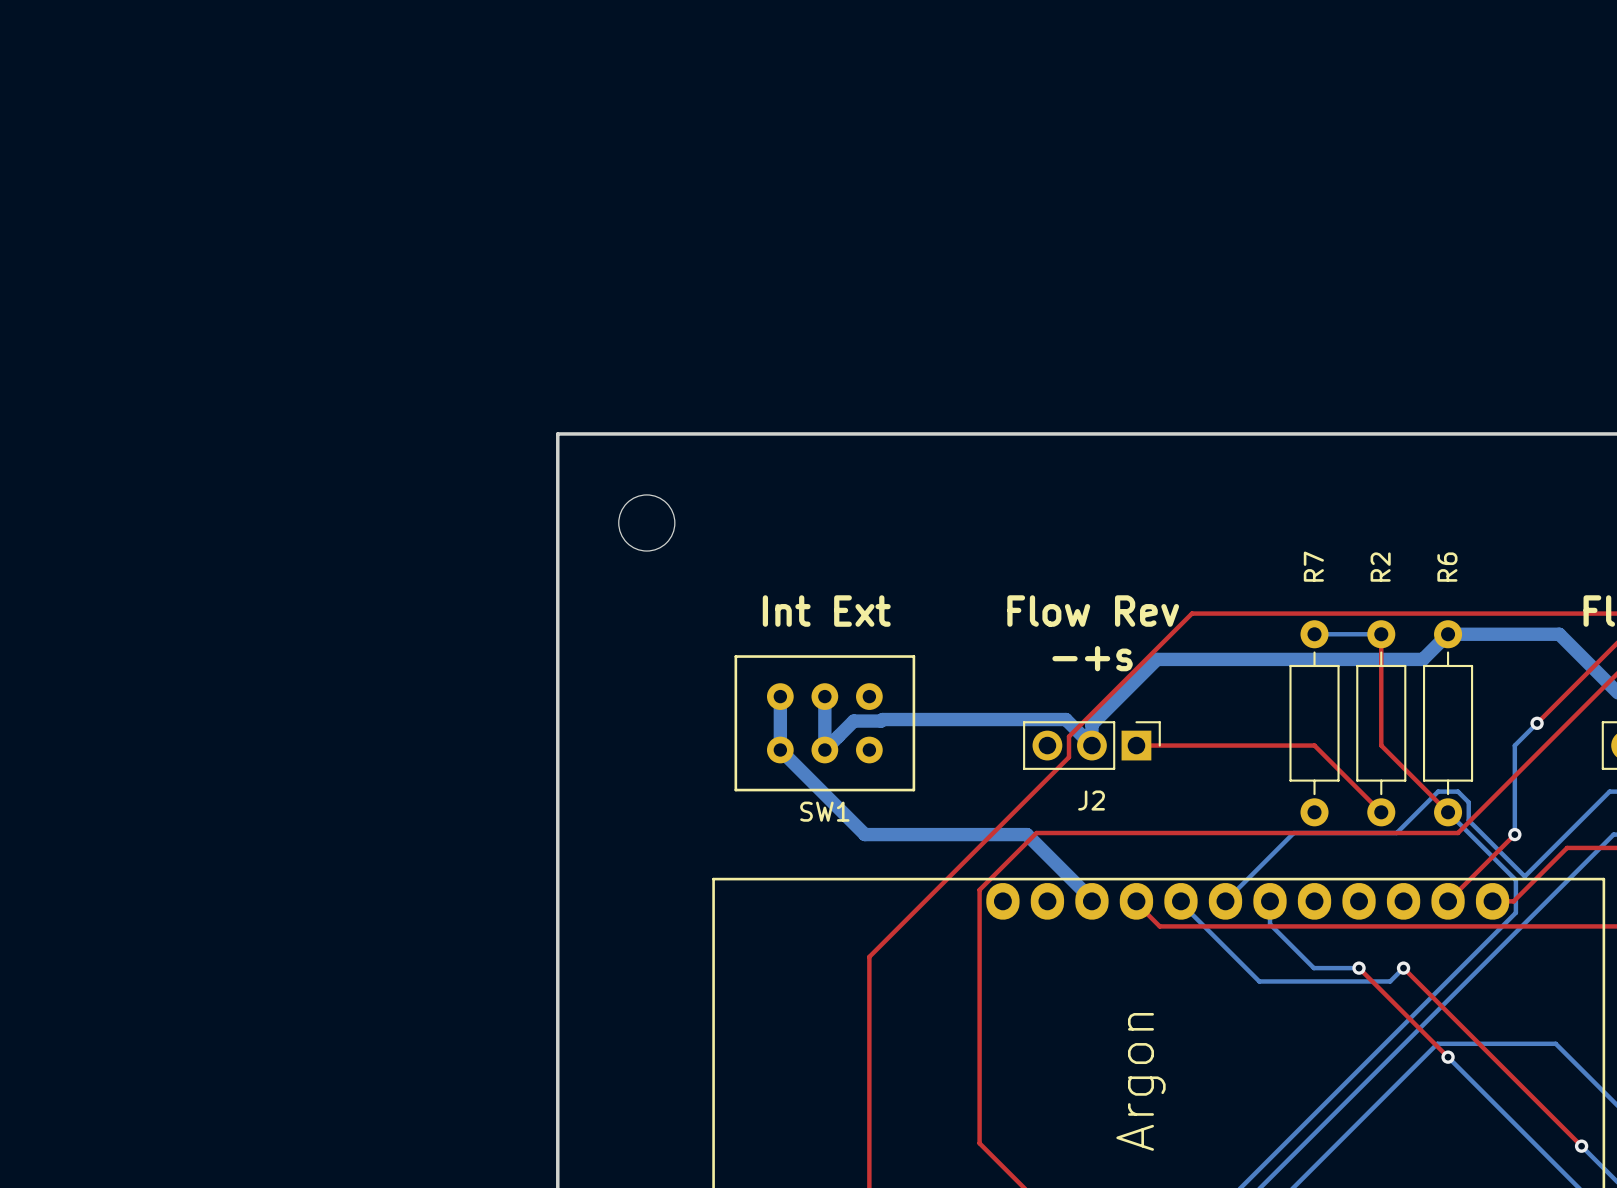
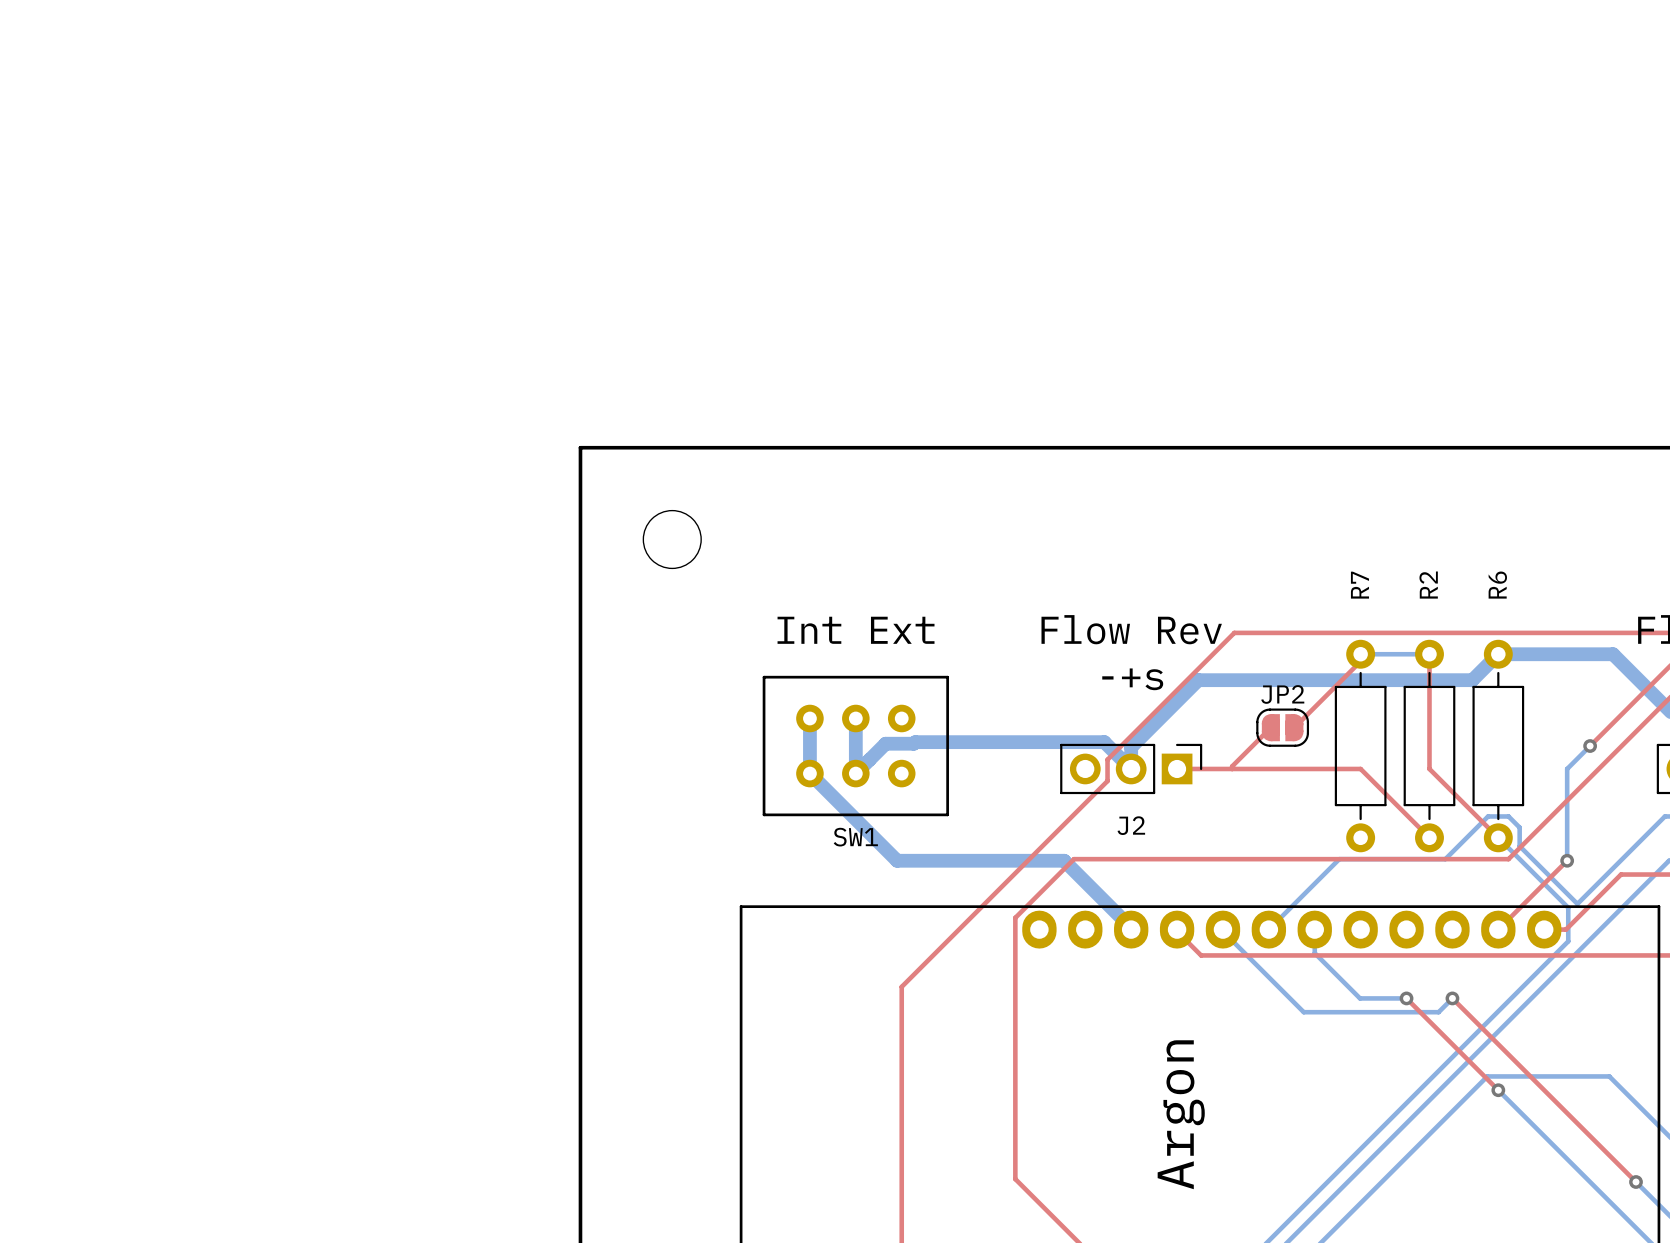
top track: none -> (1360, 654) (1360, 661) (1294, 727)
top track: none -> (1270, 727) (1232, 766) (1232, 768)
JP2: none -> (1282, 727)

